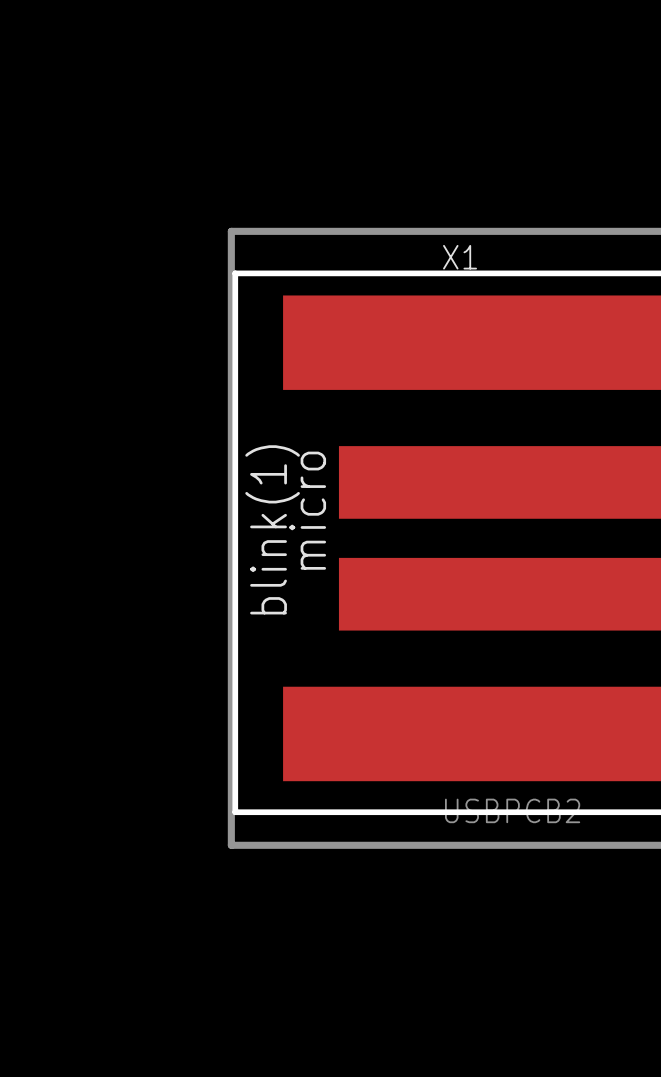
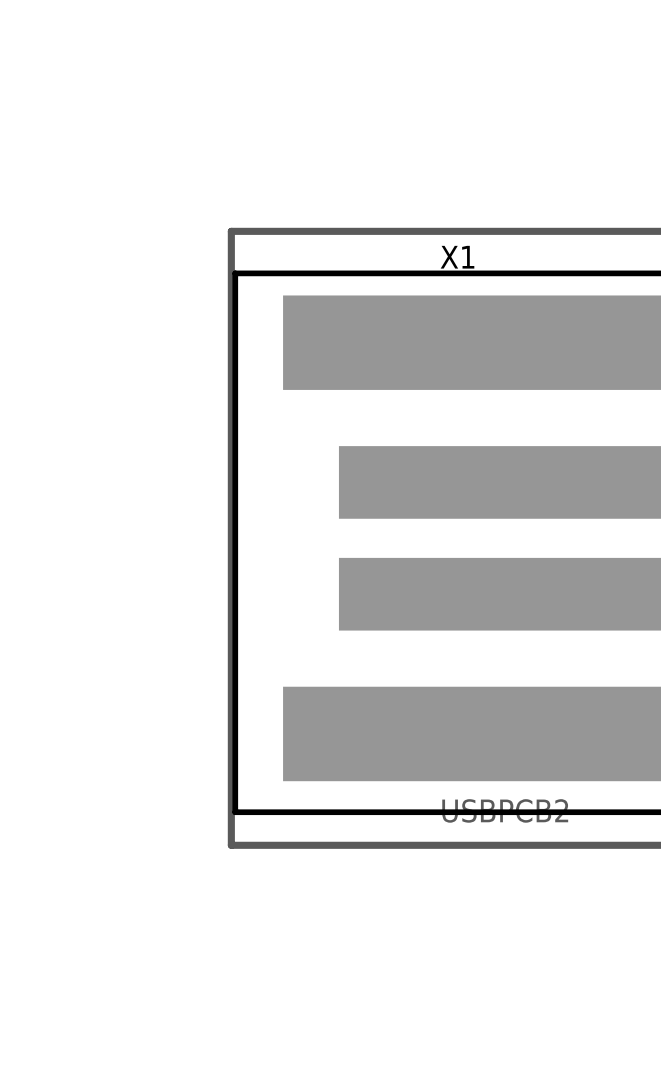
text: micro (307, 510) -> none
text: blink(1) (272, 529) -> none

